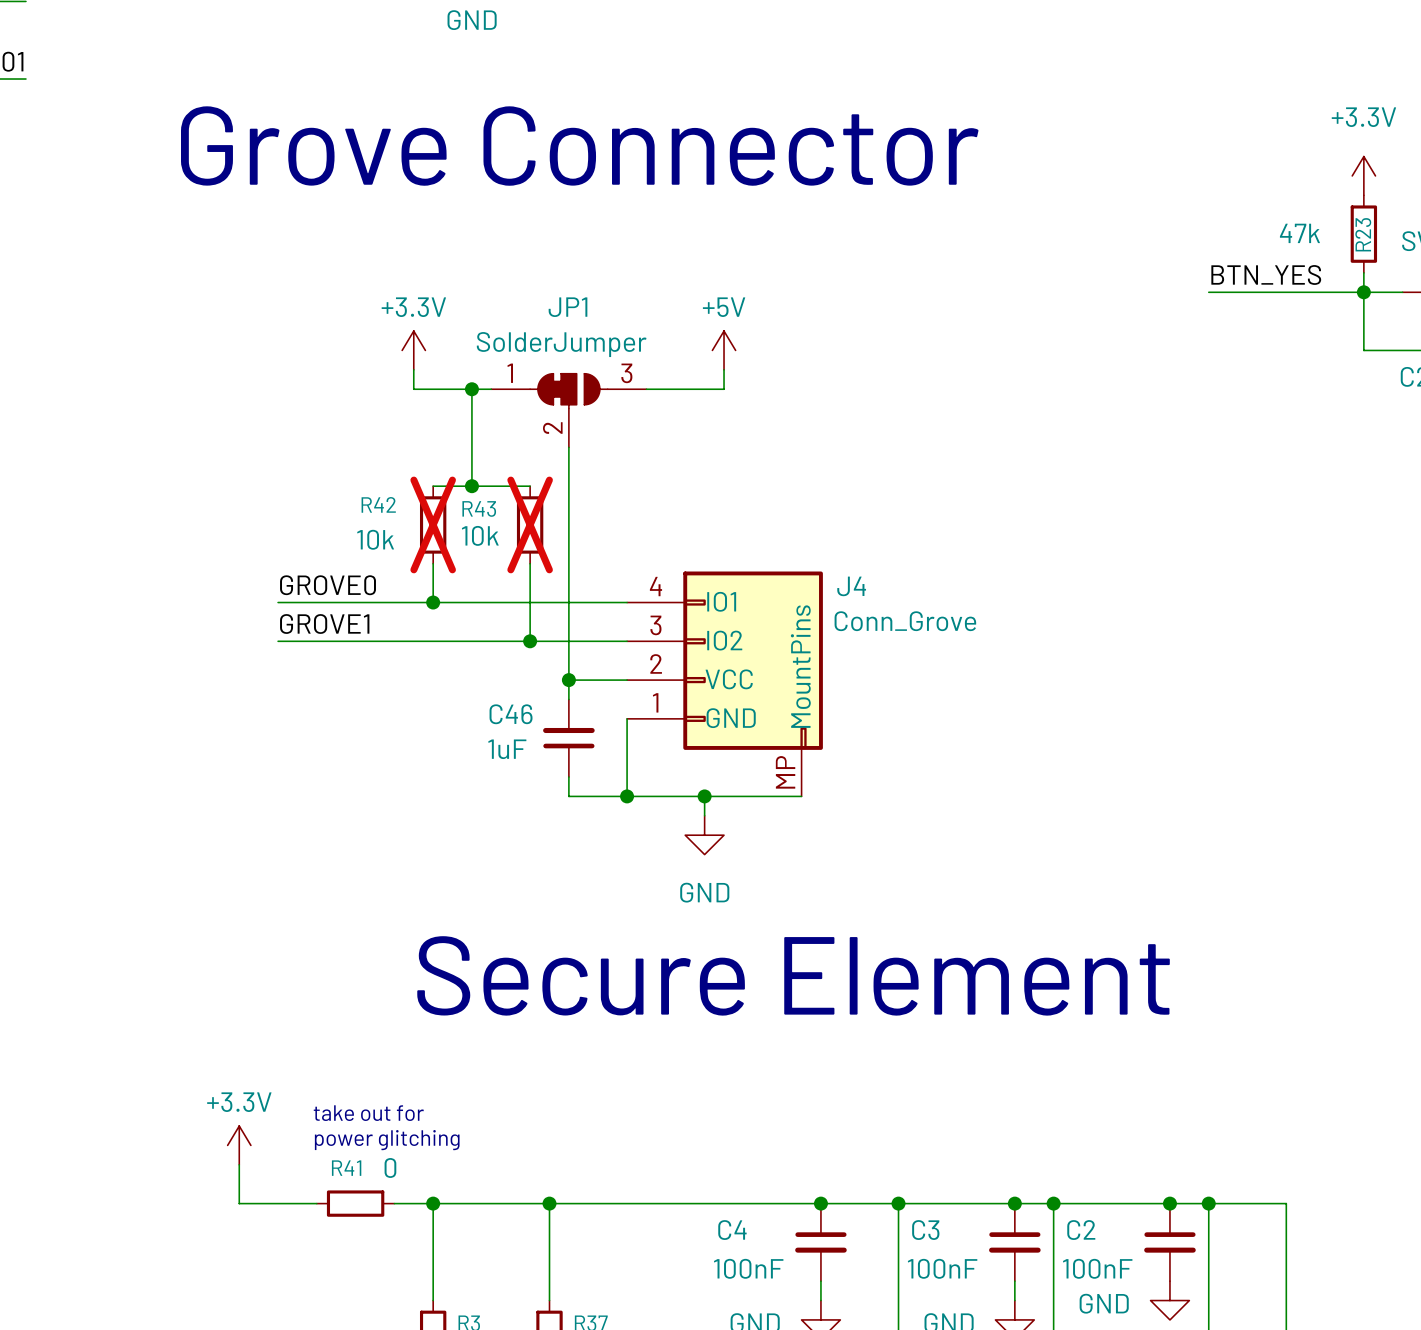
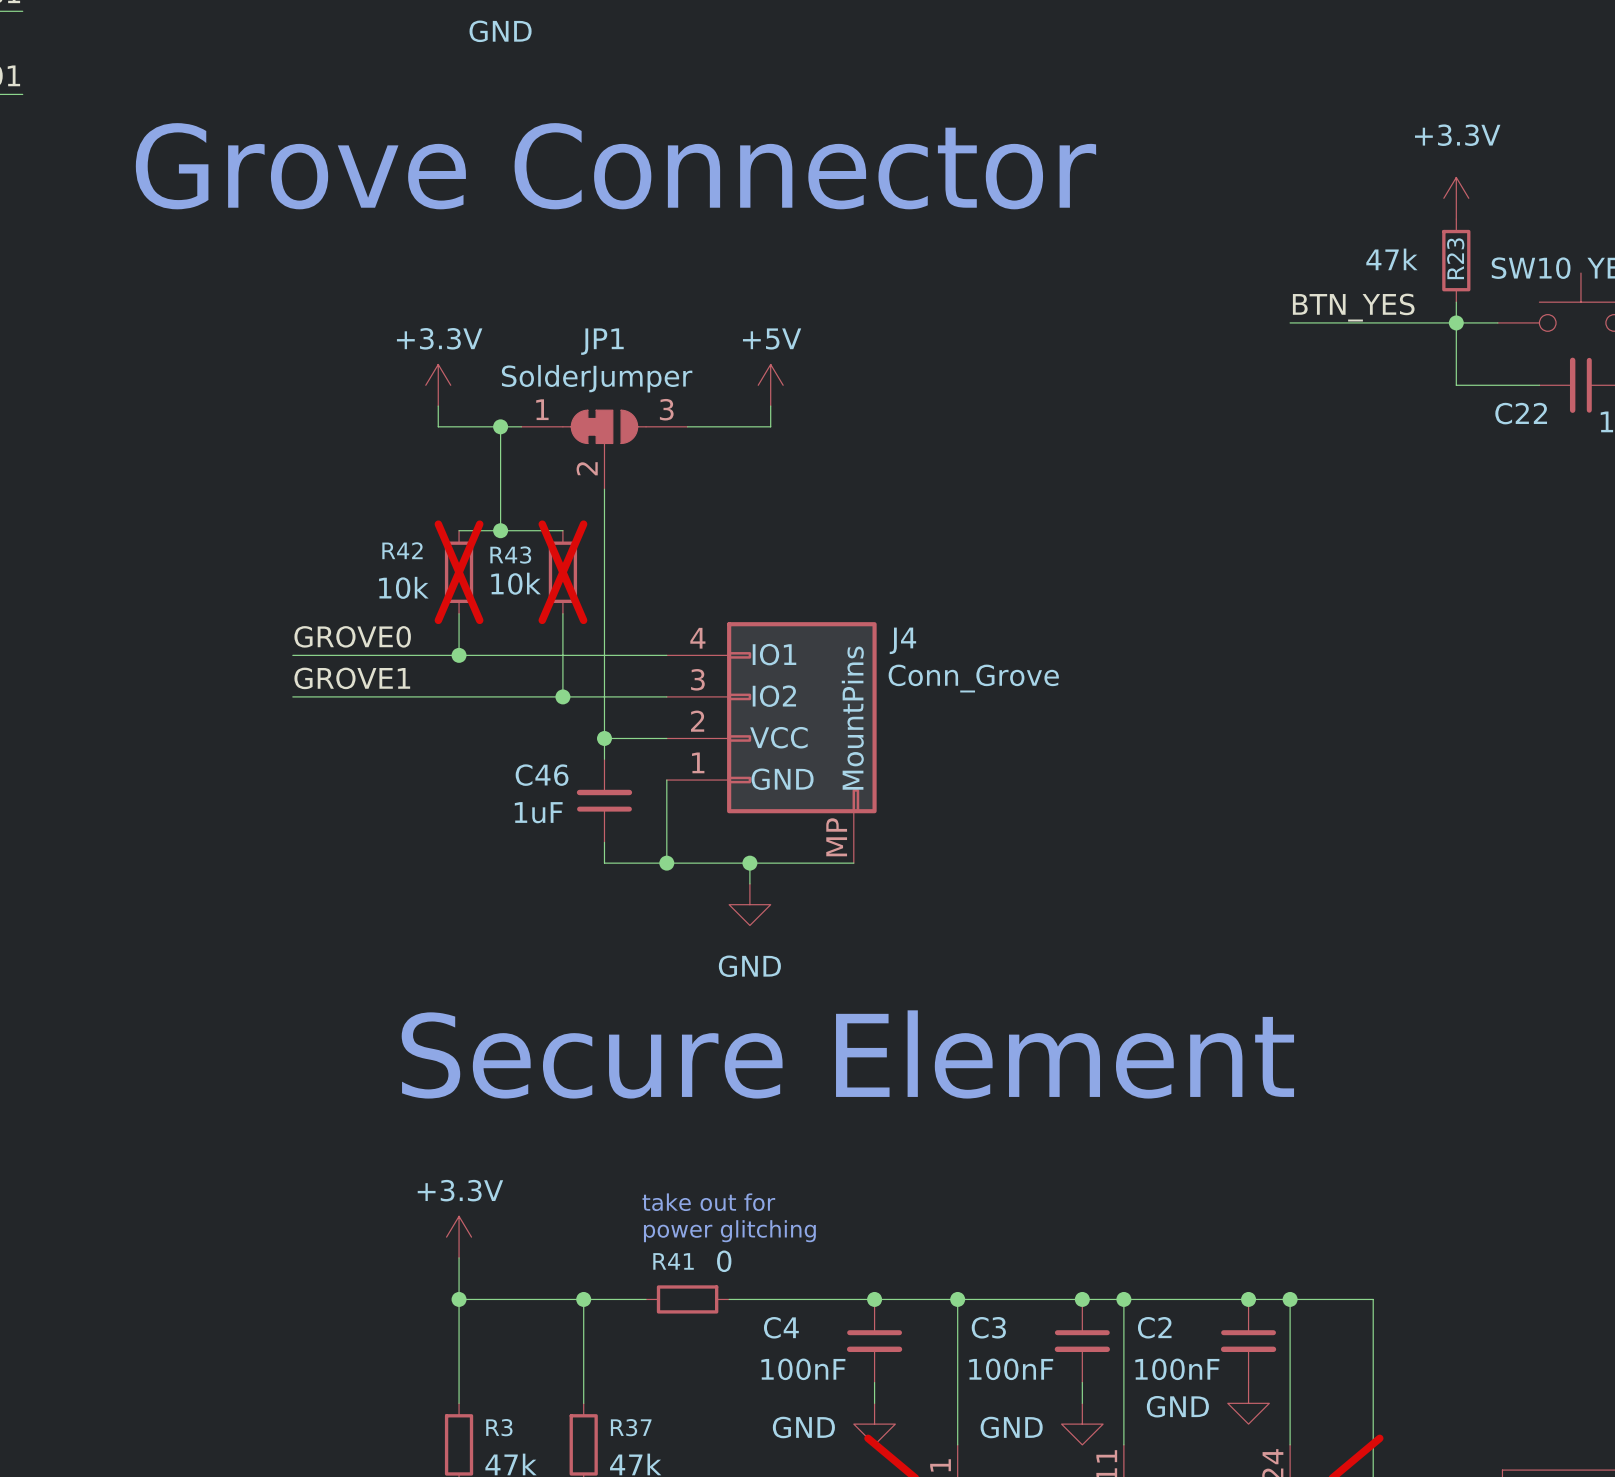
text position: take out for (368, 1113) -> take out for (708, 1202)
text position: power glitching (387, 1140) -> power glitching (729, 1231)
power symbol position: +3.3V (239, 1145) -> +3.3V (459, 1237)
wire: (239, 1164) (239, 1203) (316, 1203) -> none
R41 position: (355, 1203) -> (687, 1299)
wire: (394, 1203) (433, 1203) -> (459, 1257) (459, 1299)
wire: (607, 1203) (685, 1203) -> none

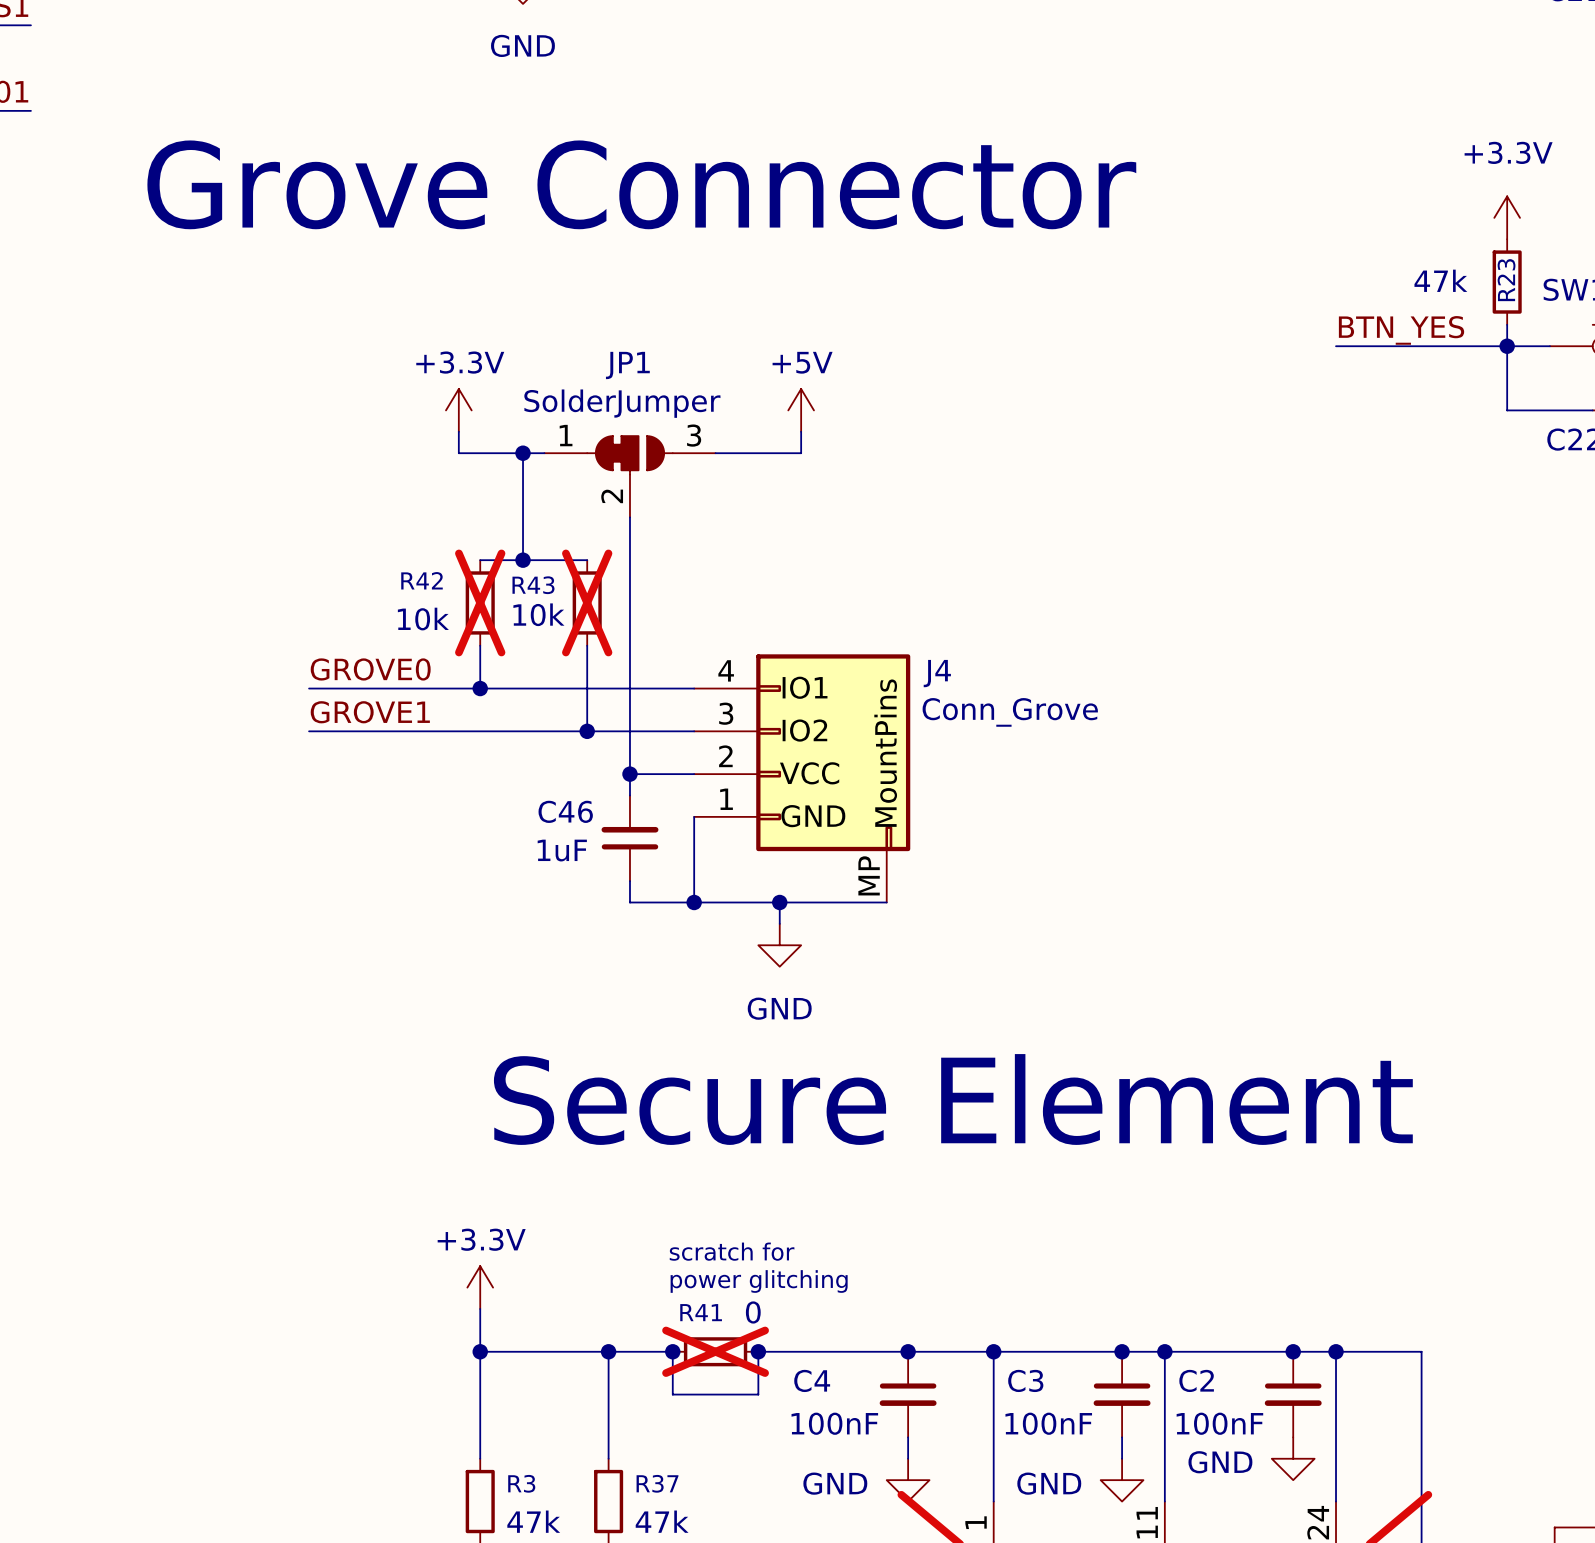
text position: Secure Element (847, 1054) -> Secure Element (953, 1099)
text: take out for (708, 1202) -> scratch for (732, 1251)
wire: none -> (672, 1351) (672, 1394) (758, 1394) (758, 1351)
junction: none -> (672, 1351)
R41 do-not-place cross: none -> (715, 1351)
junction: none -> (758, 1351)

